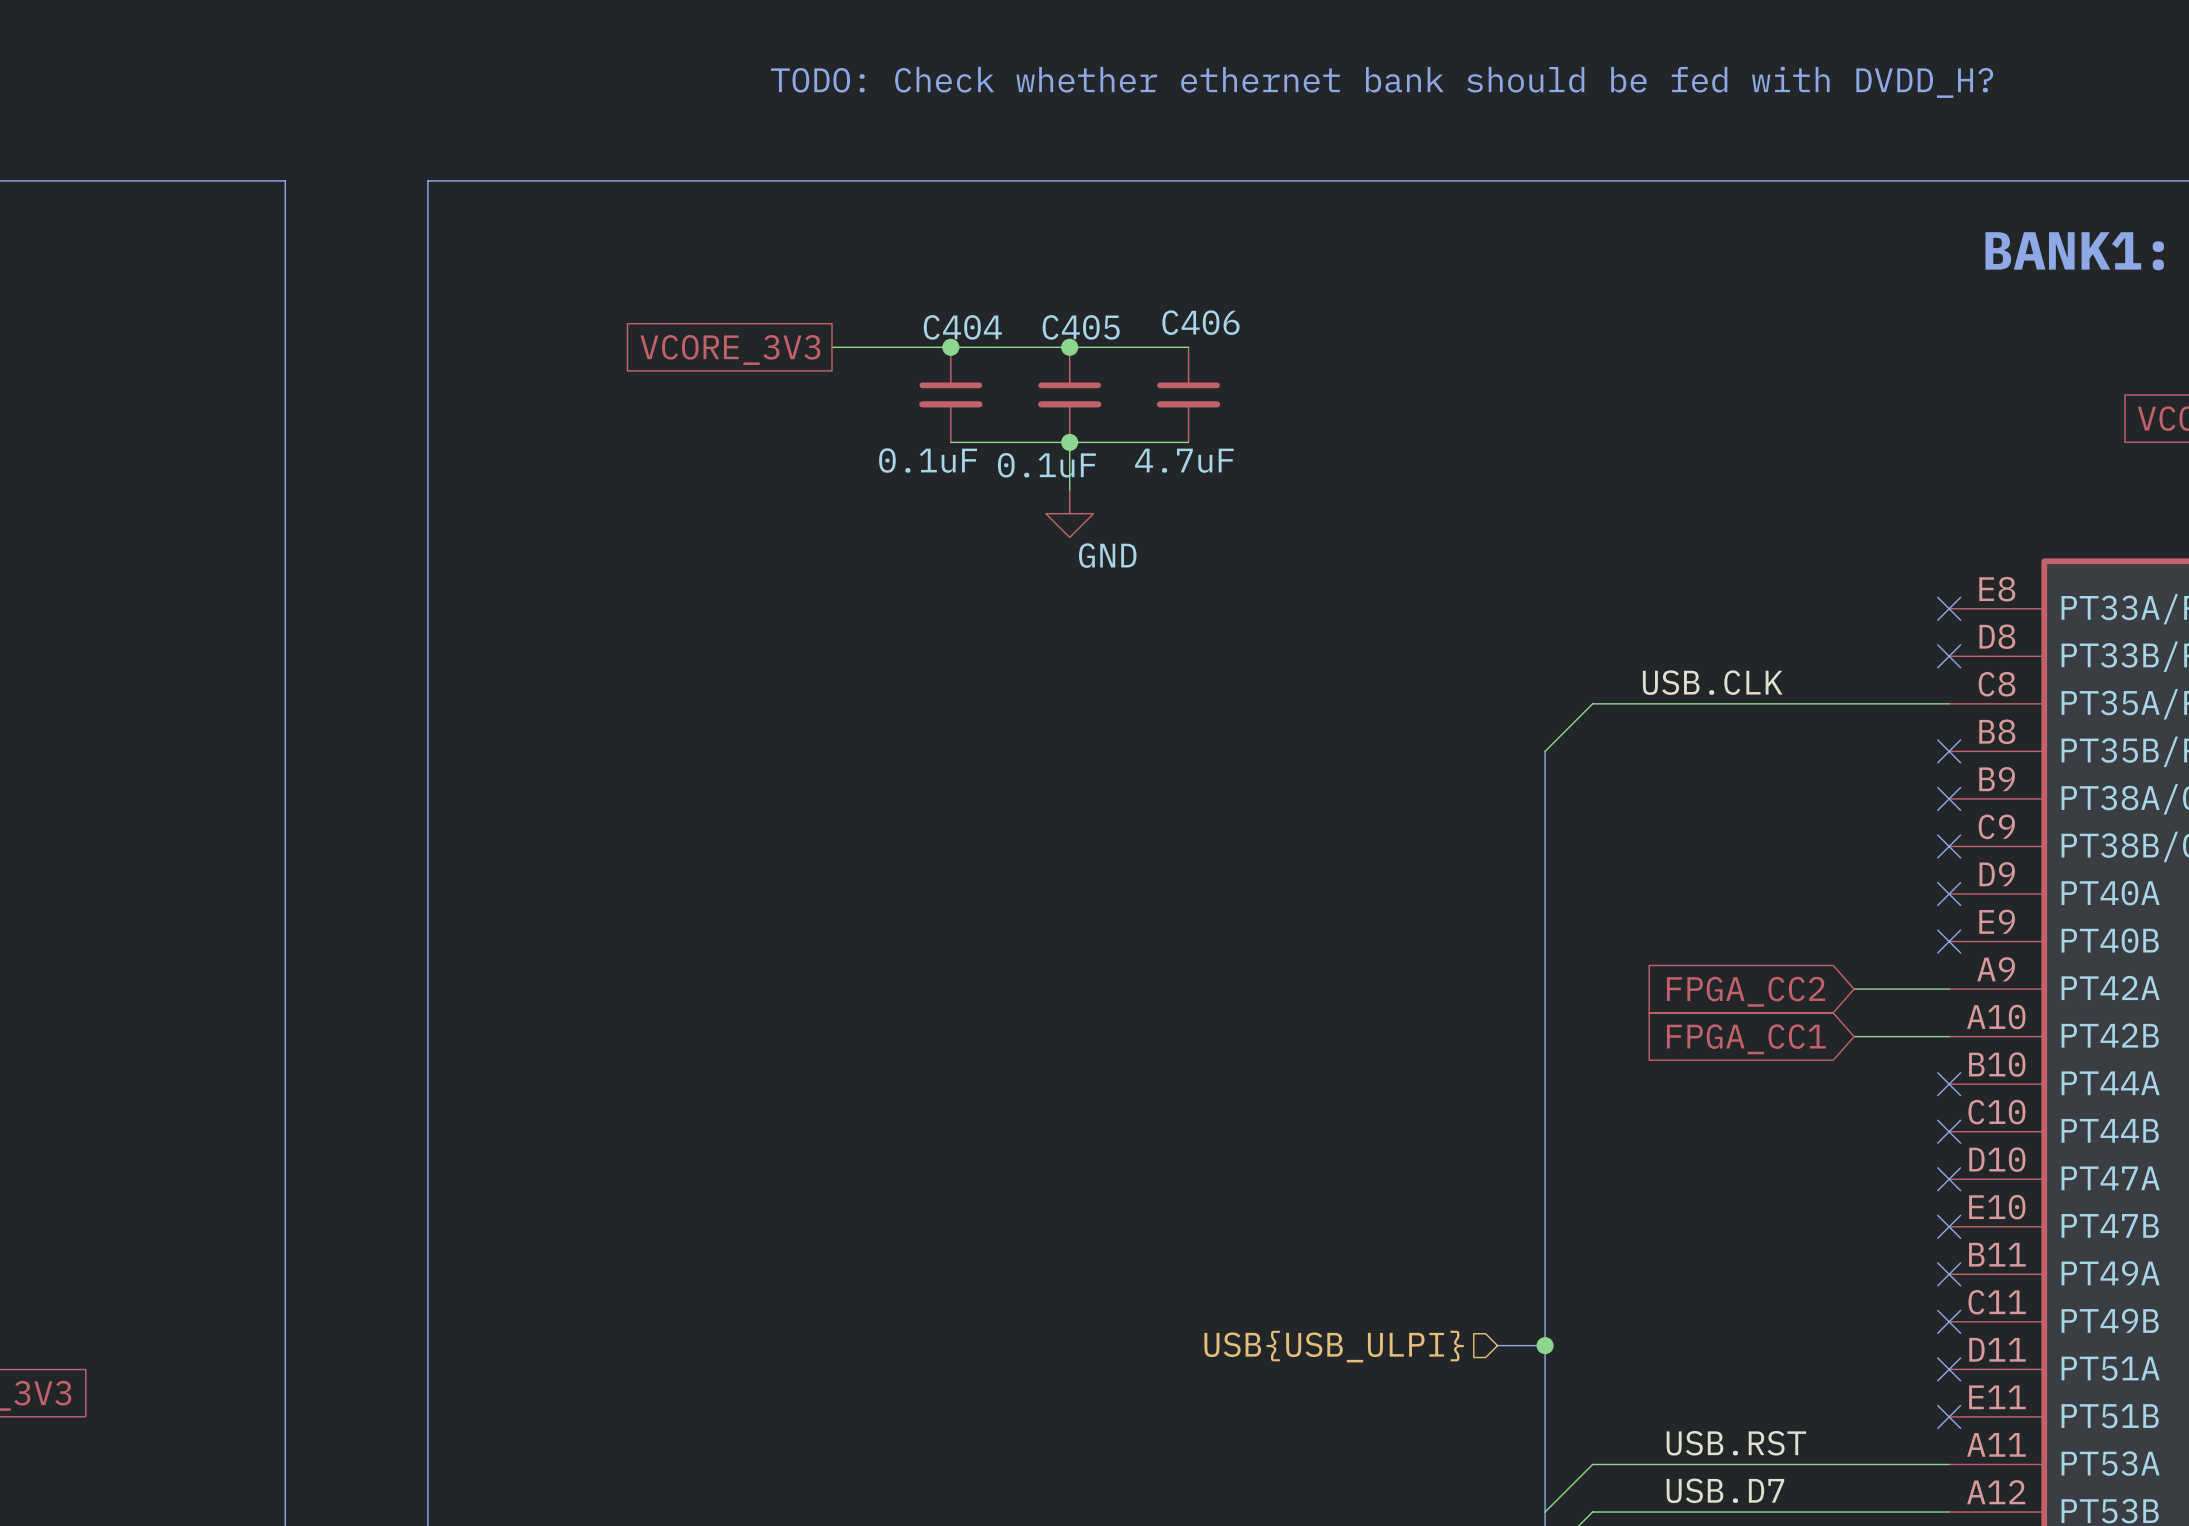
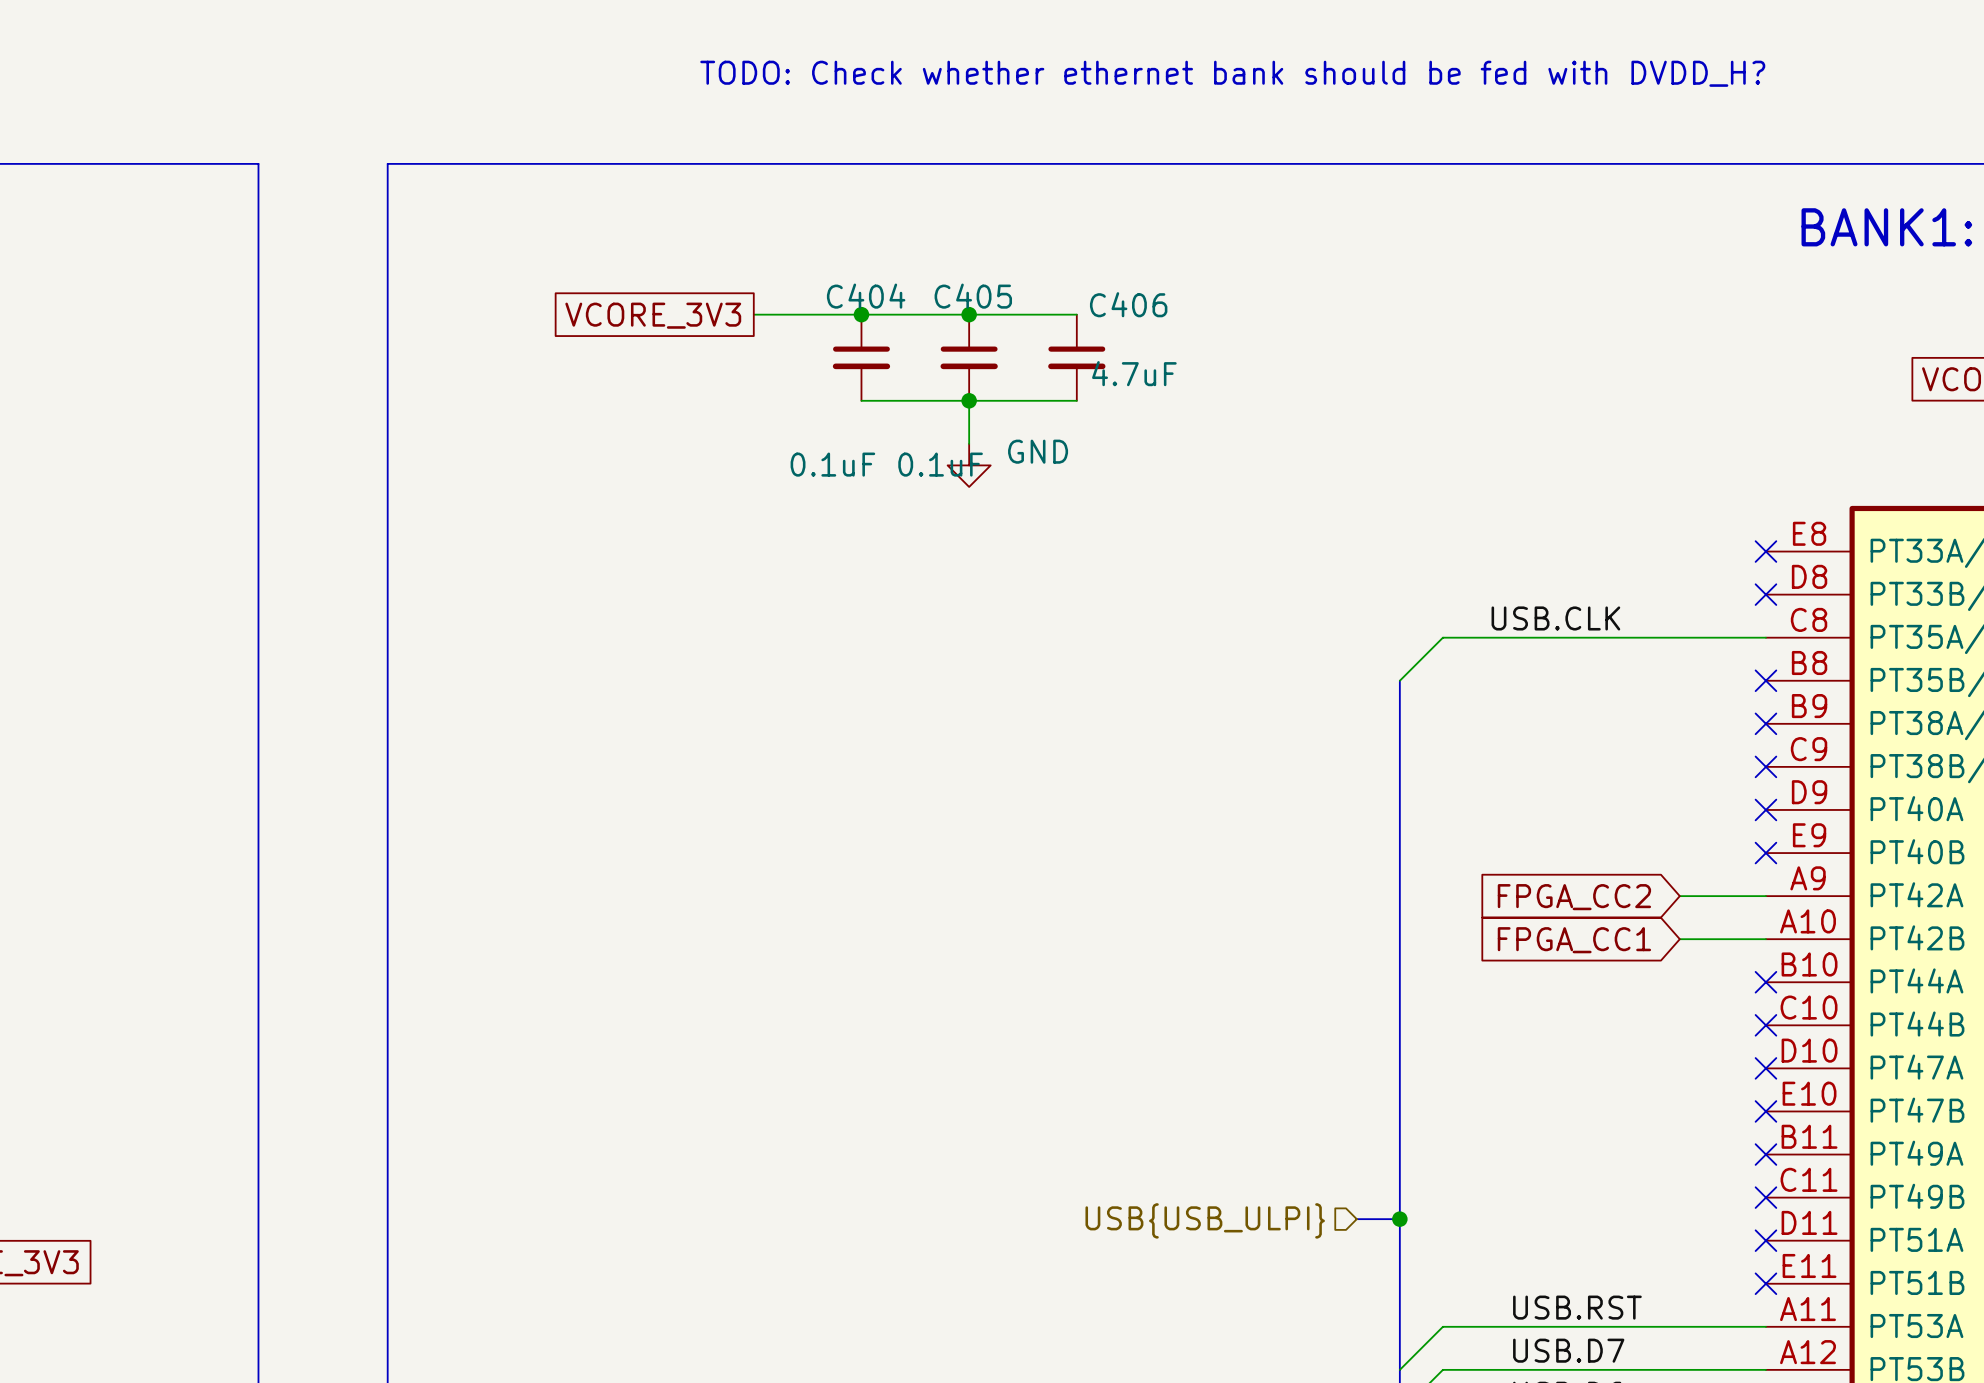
C406 name position: C406 (1200, 322) -> C406 (1128, 304)
C404 value position: 0.1uF (928, 460) -> 0.1uF (832, 464)
C406 value position: 4.7uF (1184, 460) -> 4.7uF (1134, 373)
C405 value position: 0.1uF (1046, 465) -> 0.1uF (940, 464)
power symbol text position: GND (1107, 555) -> GND (1038, 451)

